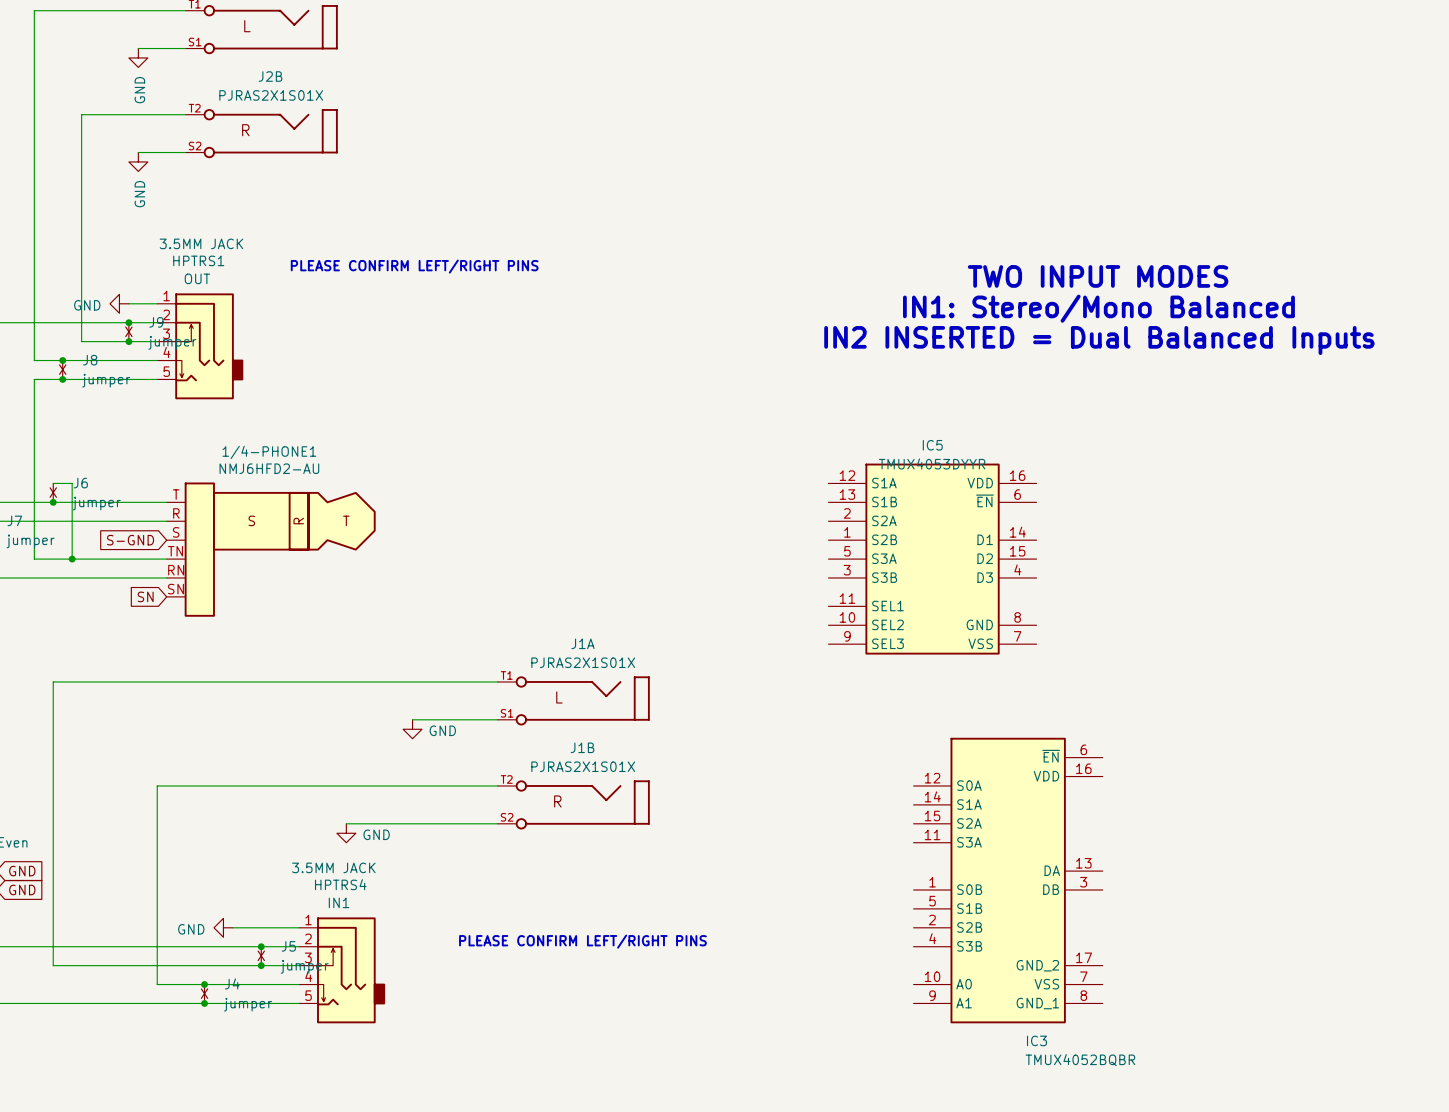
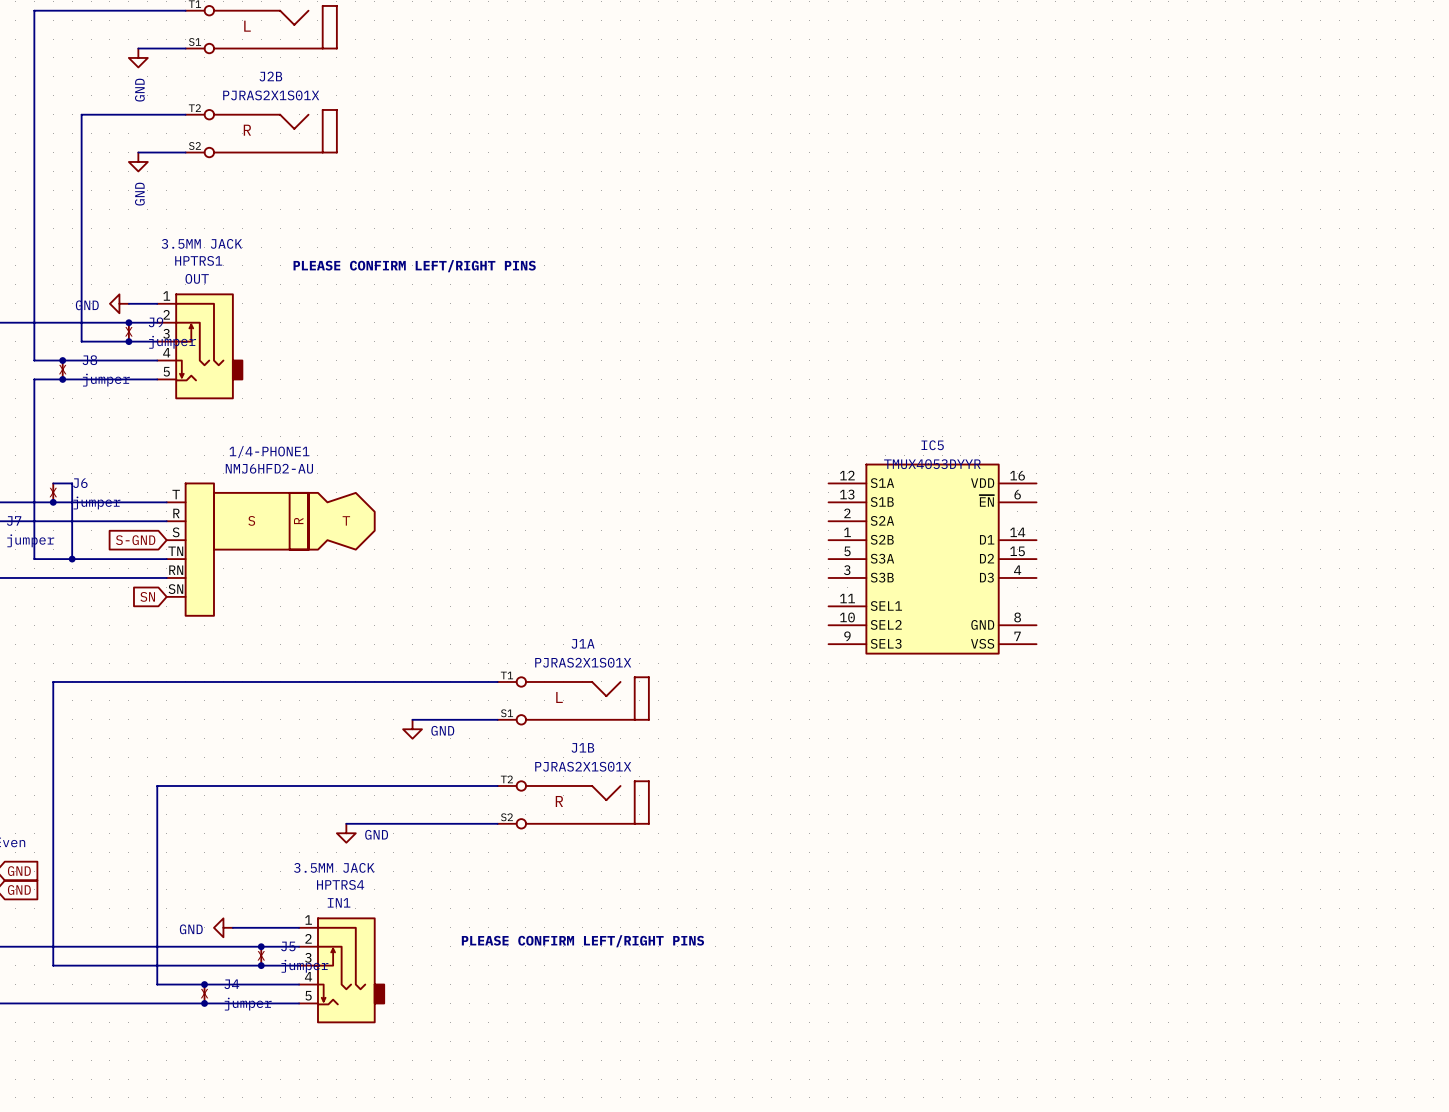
text: TWO INPUT MODES (1098, 276) -> none
text: IN1: Stereo/Mono Balanced (1098, 308) -> none
text: IN2 INSERTED = Dual Balanced Inputs (1099, 340) -> none
IC3: TMUX4052BQBR (1008, 880) -> none

